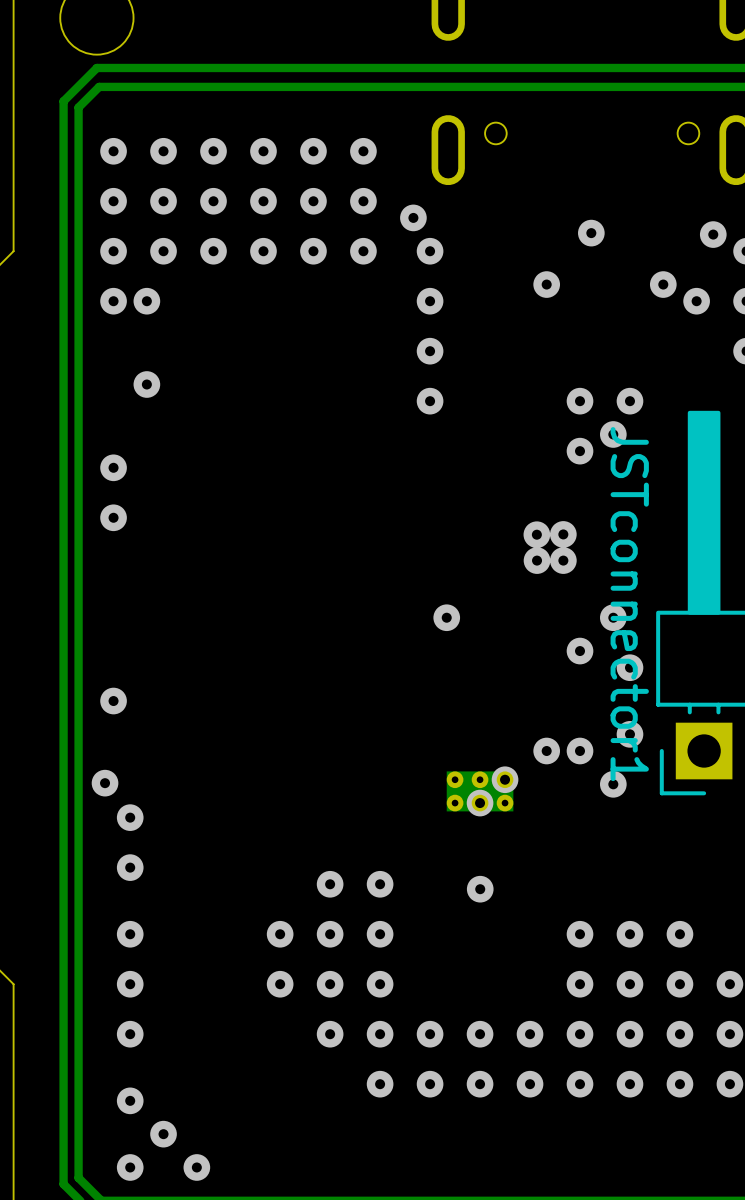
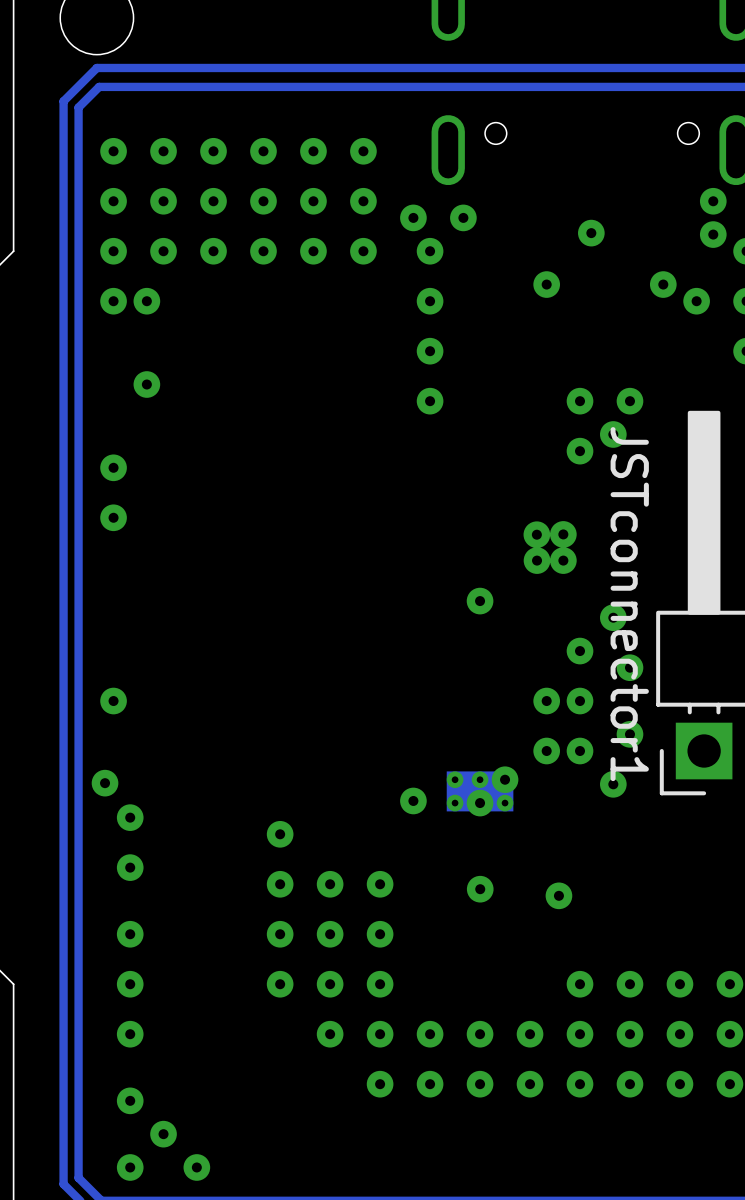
via: none -> (713, 201)
via: none -> (463, 217)
via position: (446, 617) -> (480, 601)
via: none -> (546, 701)
via: none -> (580, 701)
via: none -> (413, 800)
via: none -> (280, 834)
via: none -> (280, 884)
via: none -> (558, 895)
via: (580, 934) -> none
via: (629, 934) -> none
via: (679, 934) -> none

